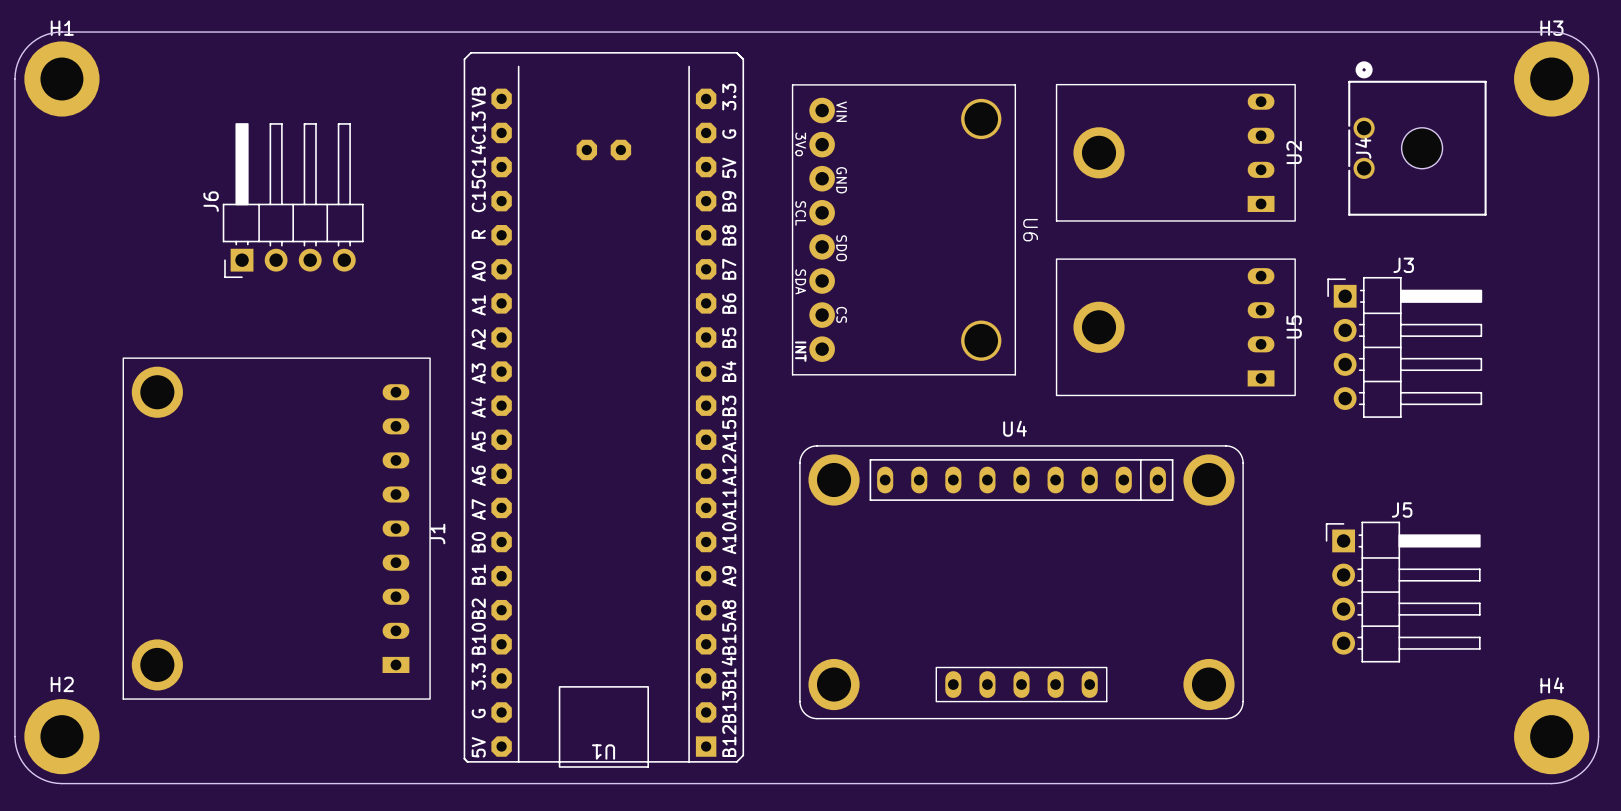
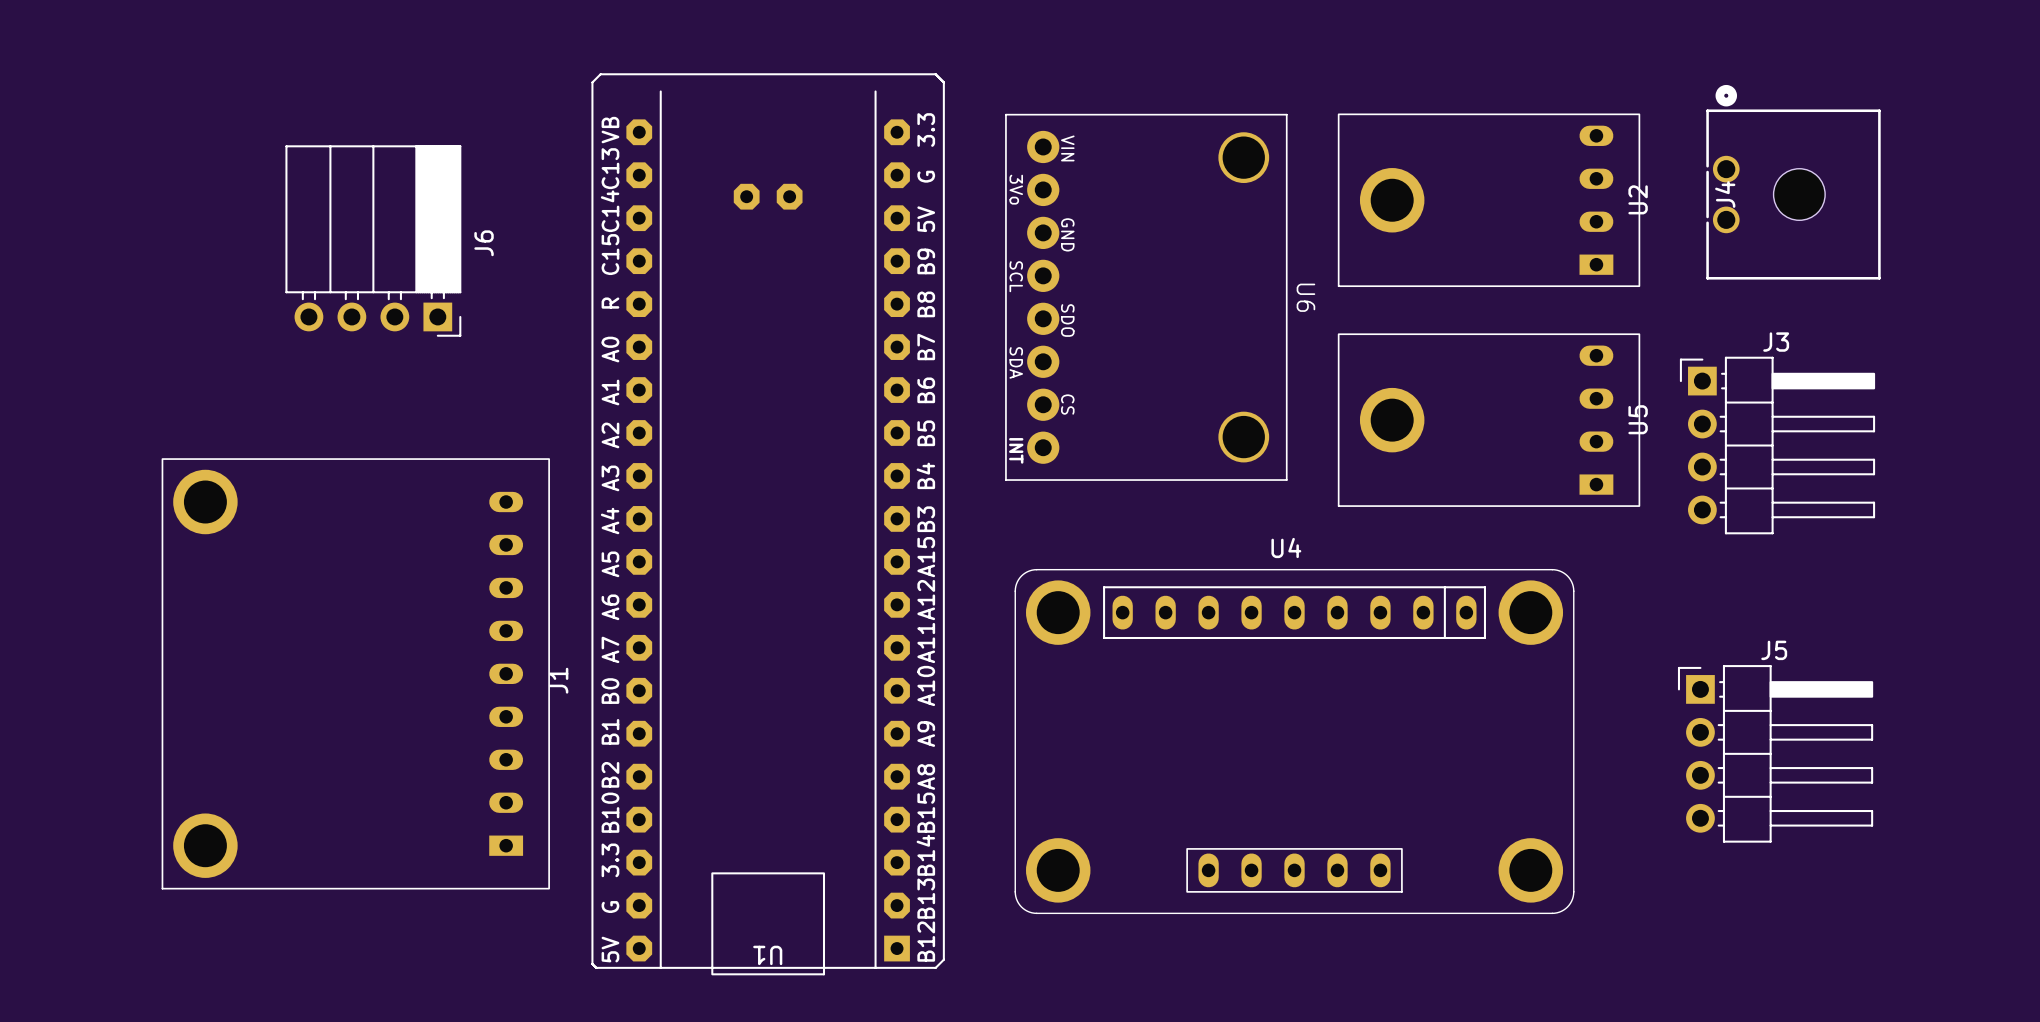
board edge: (61, 32) (1551, 32) (1572, 36) (1584, 45) (1591, 54) (1597, 68) (1598, 79) (1598, 736) (1593, 756) (1584, 769) (1576, 776) (1562, 782) (1551, 783) (61, 783) (41, 778) (32, 773) (22, 761) (17, 752) (14, 736) (14, 79) (19, 58) (28, 45) (46, 34) (61, 32) -> none
H1: (61, 79) -> none
H3: (1551, 79) -> none
J6 footprint: [222, 123, 364, 279] -> [285, 145, 462, 337]
J6 name position: J6 (211, 201) -> J6 (484, 243)
H2: (61, 736) -> none
H4: (1551, 736) -> none

